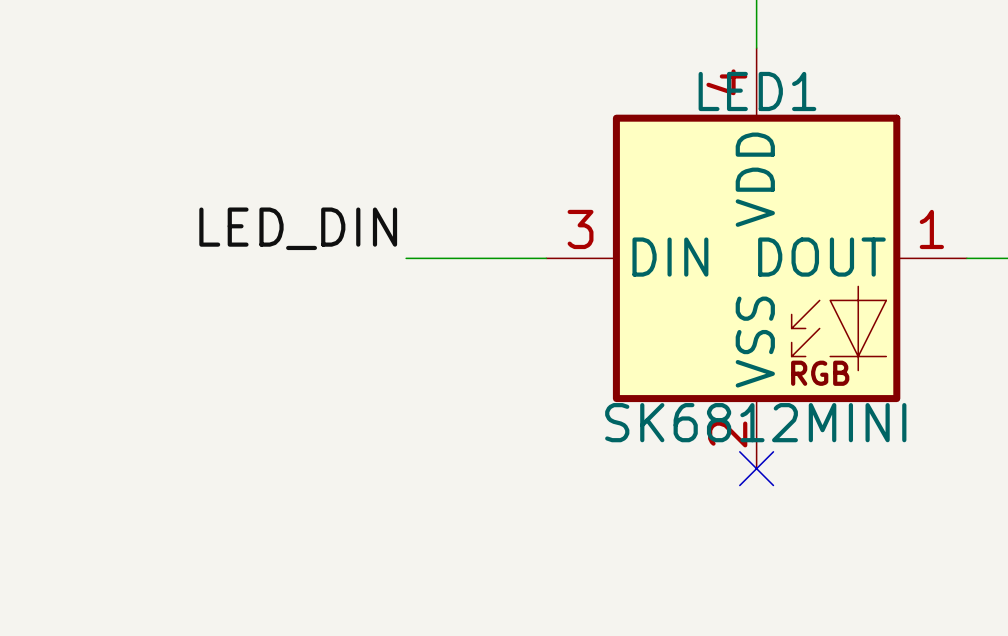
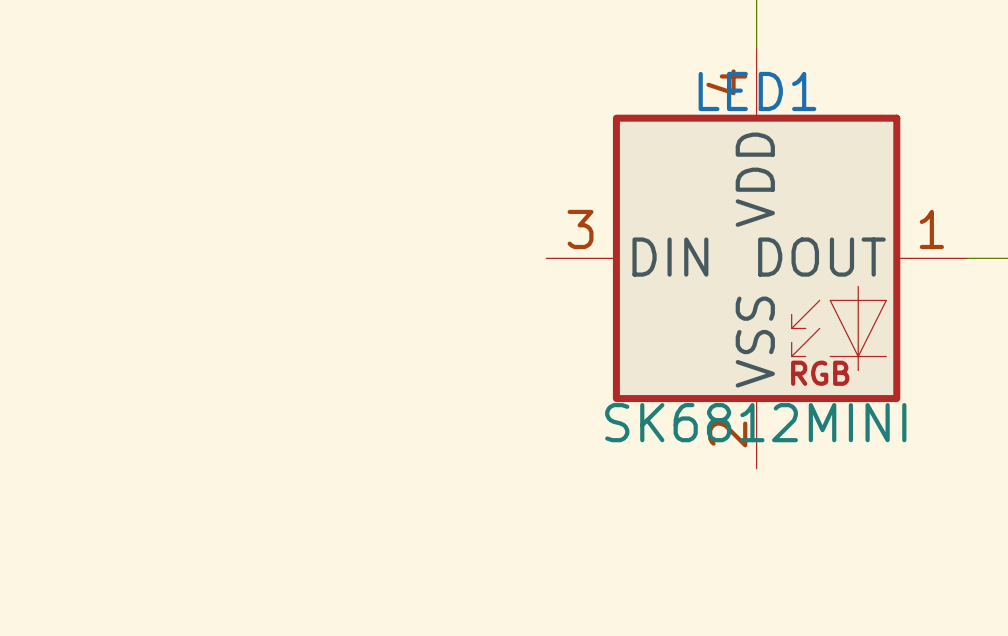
label: LED_DIN (298, 228) -> none
wire: (406, 258) (546, 258) -> none
no-connect mark: (756, 468) -> none

